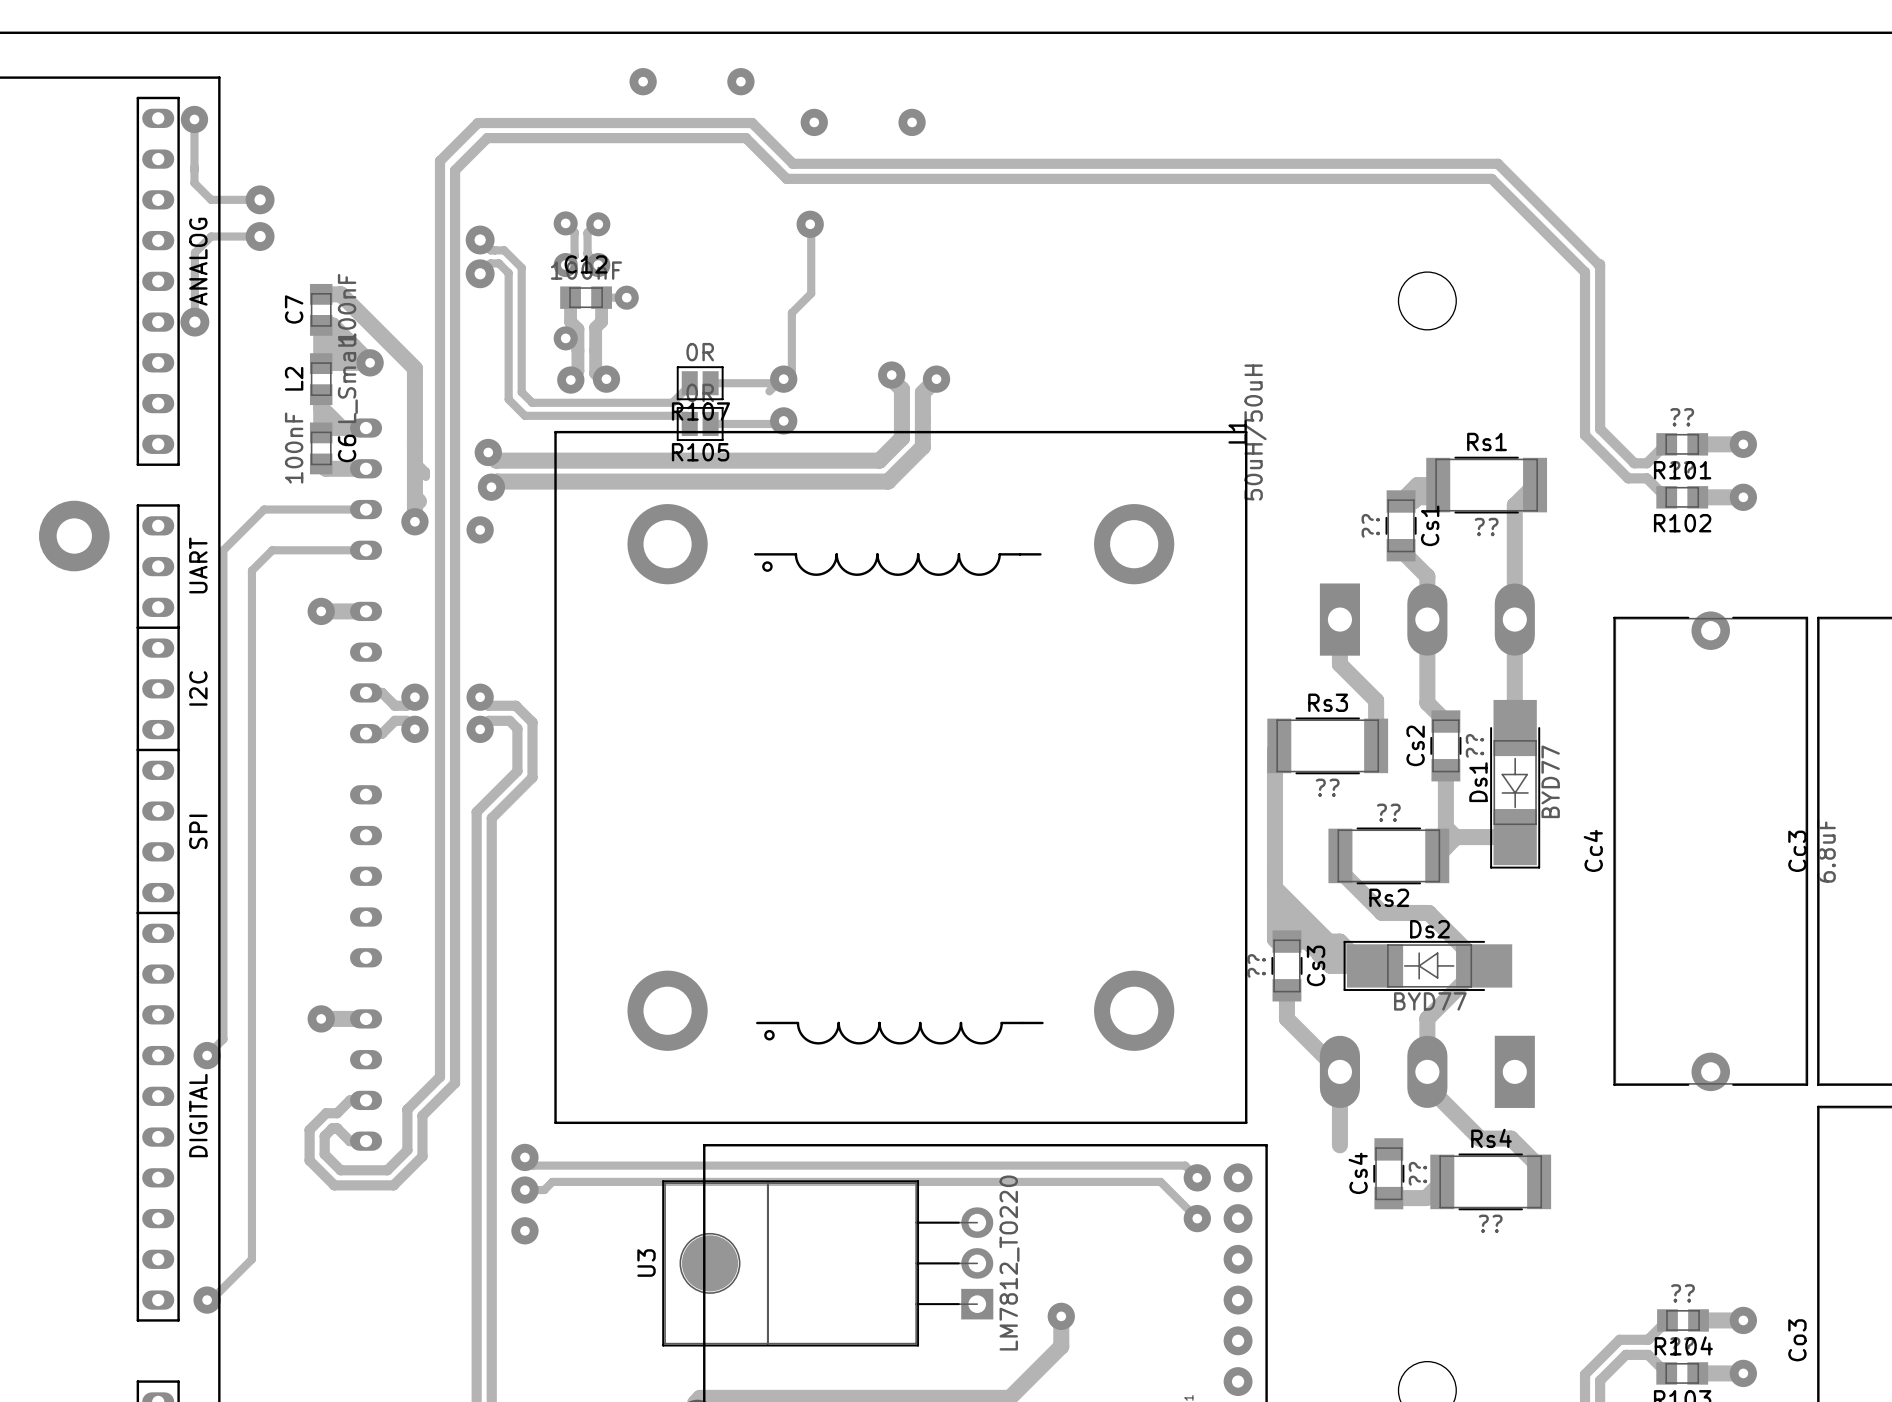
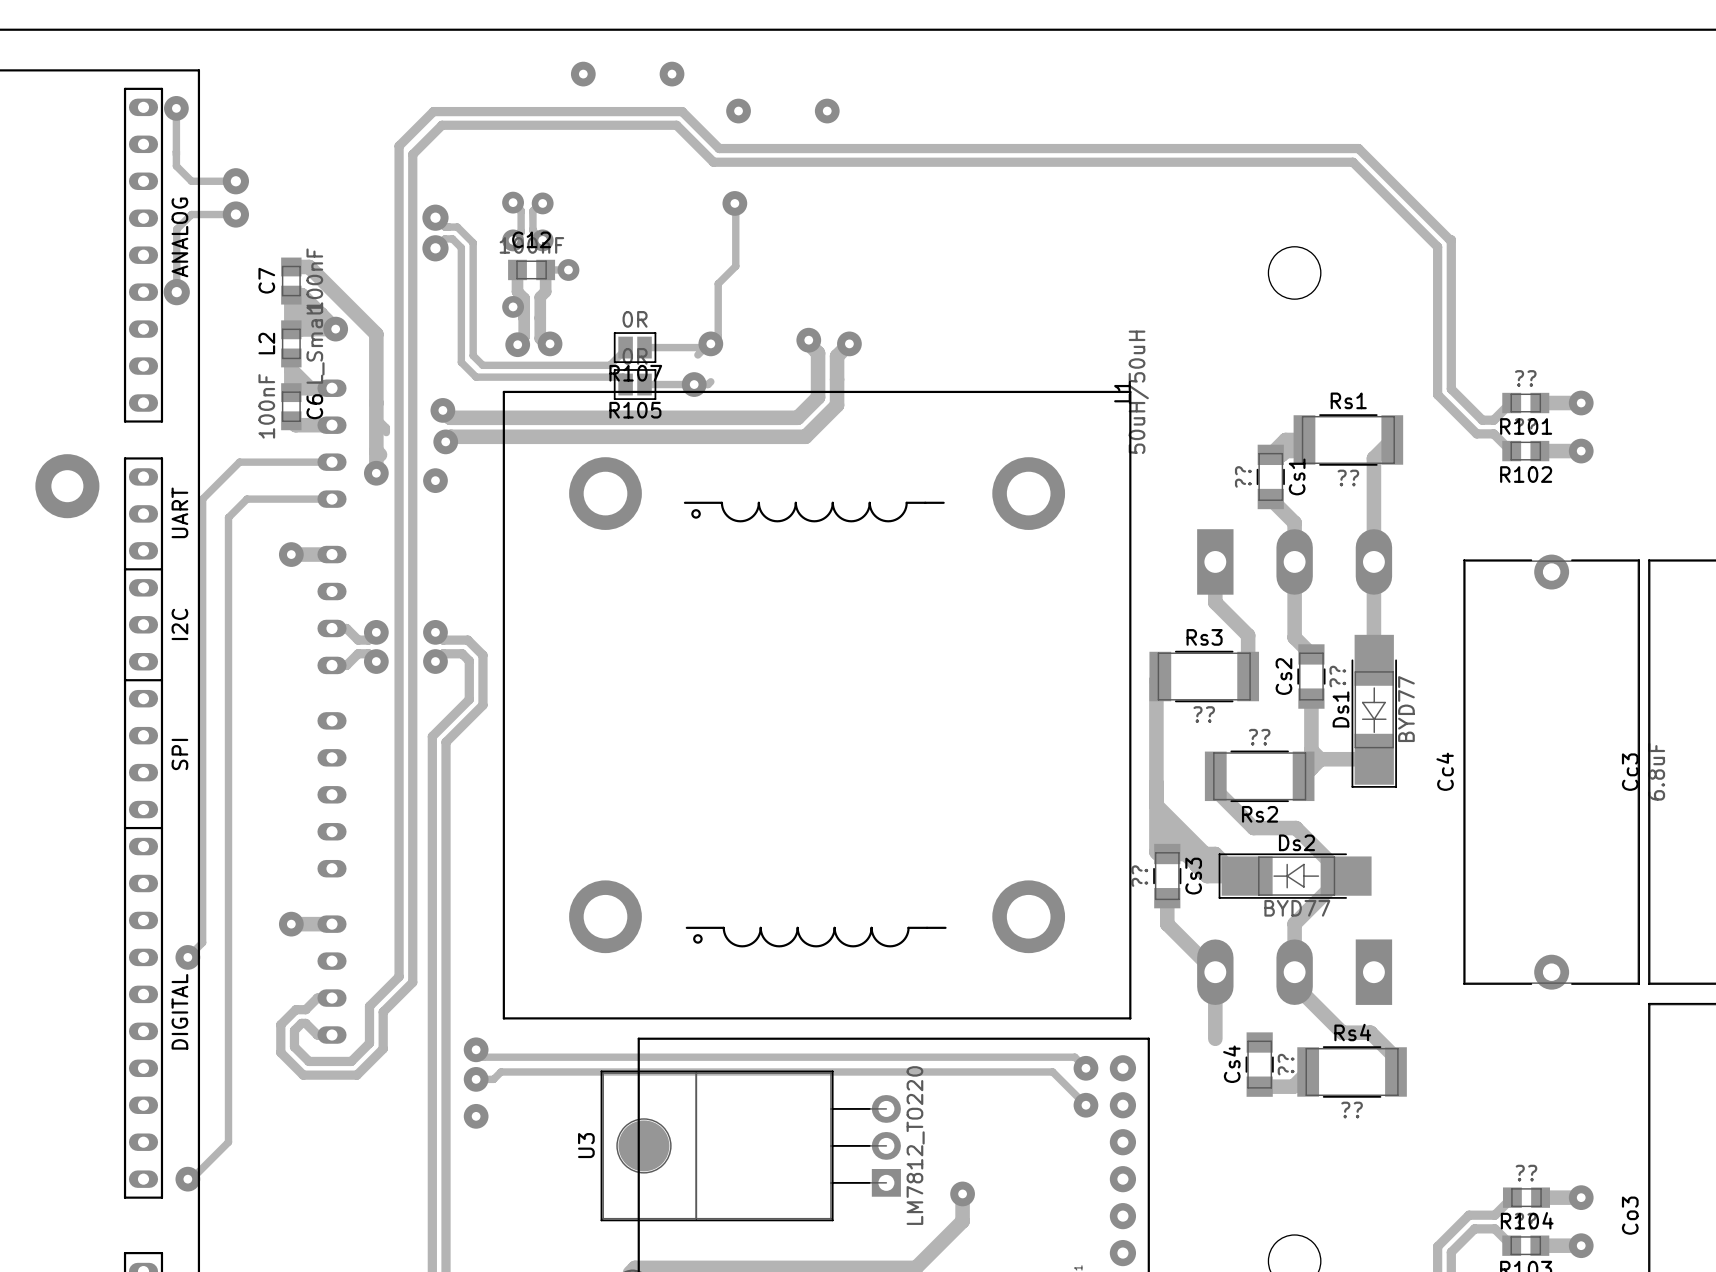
via position: (783, 420) -> (694, 384)

